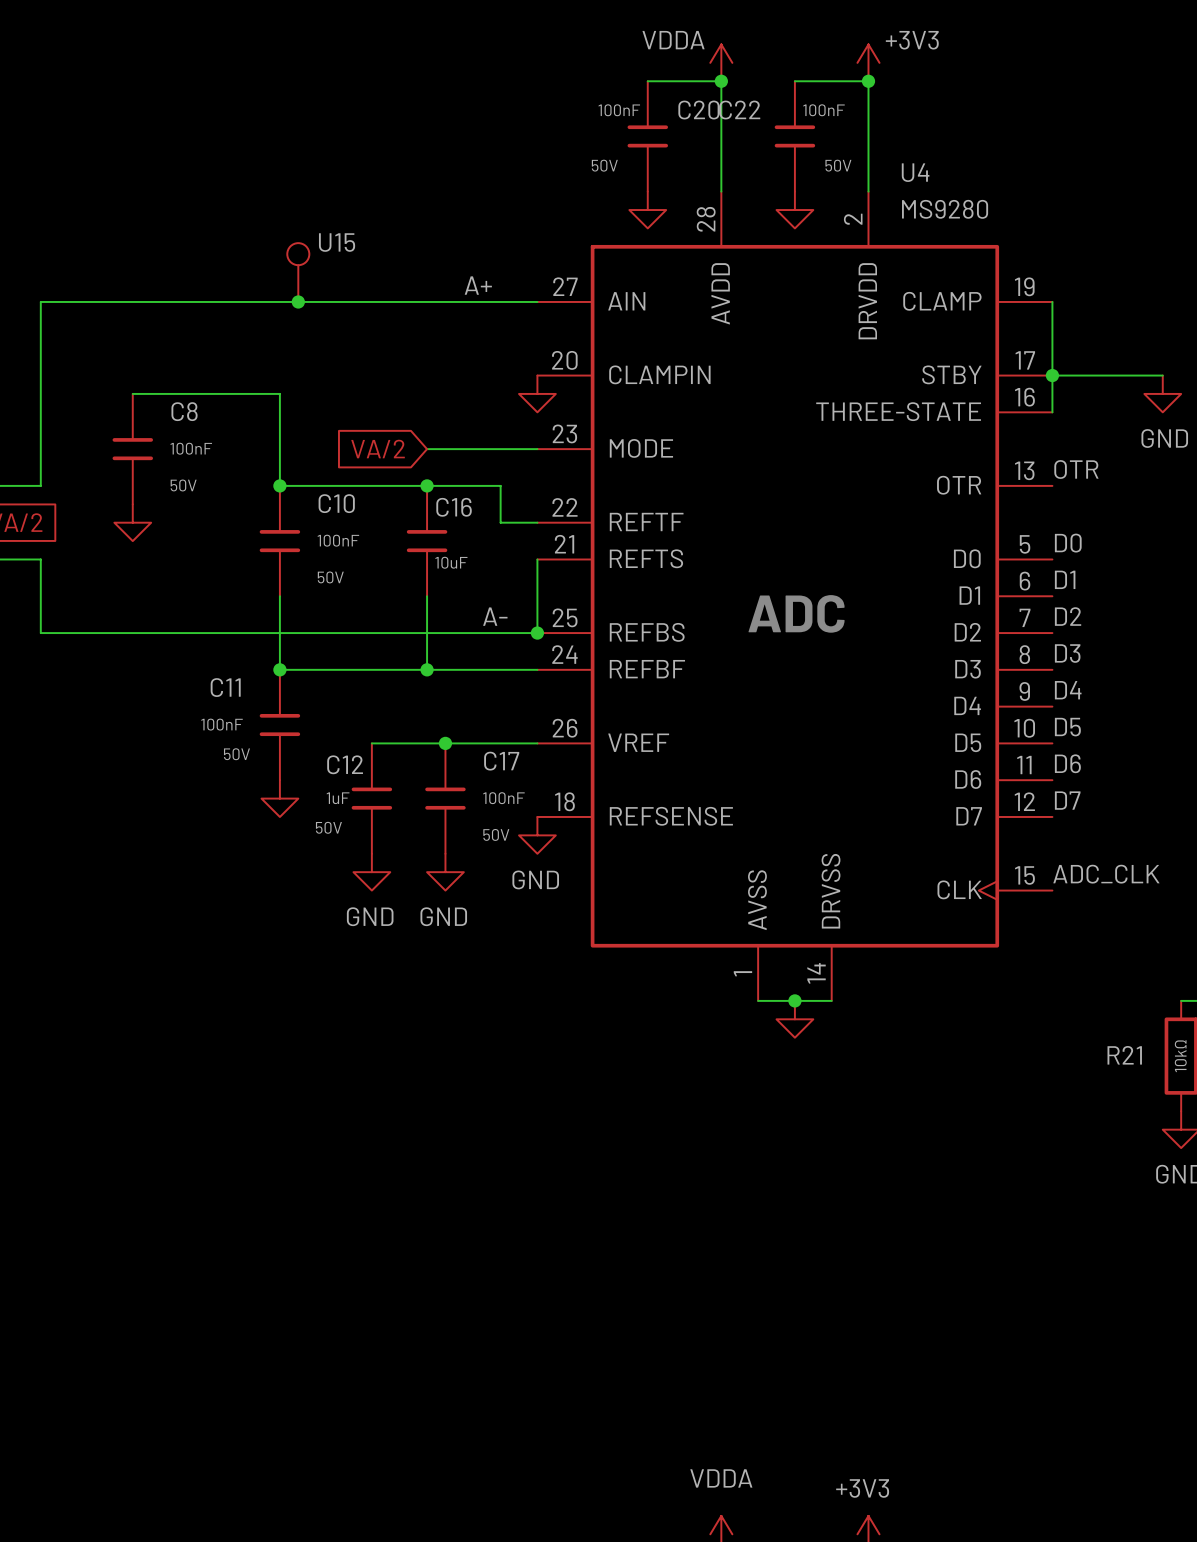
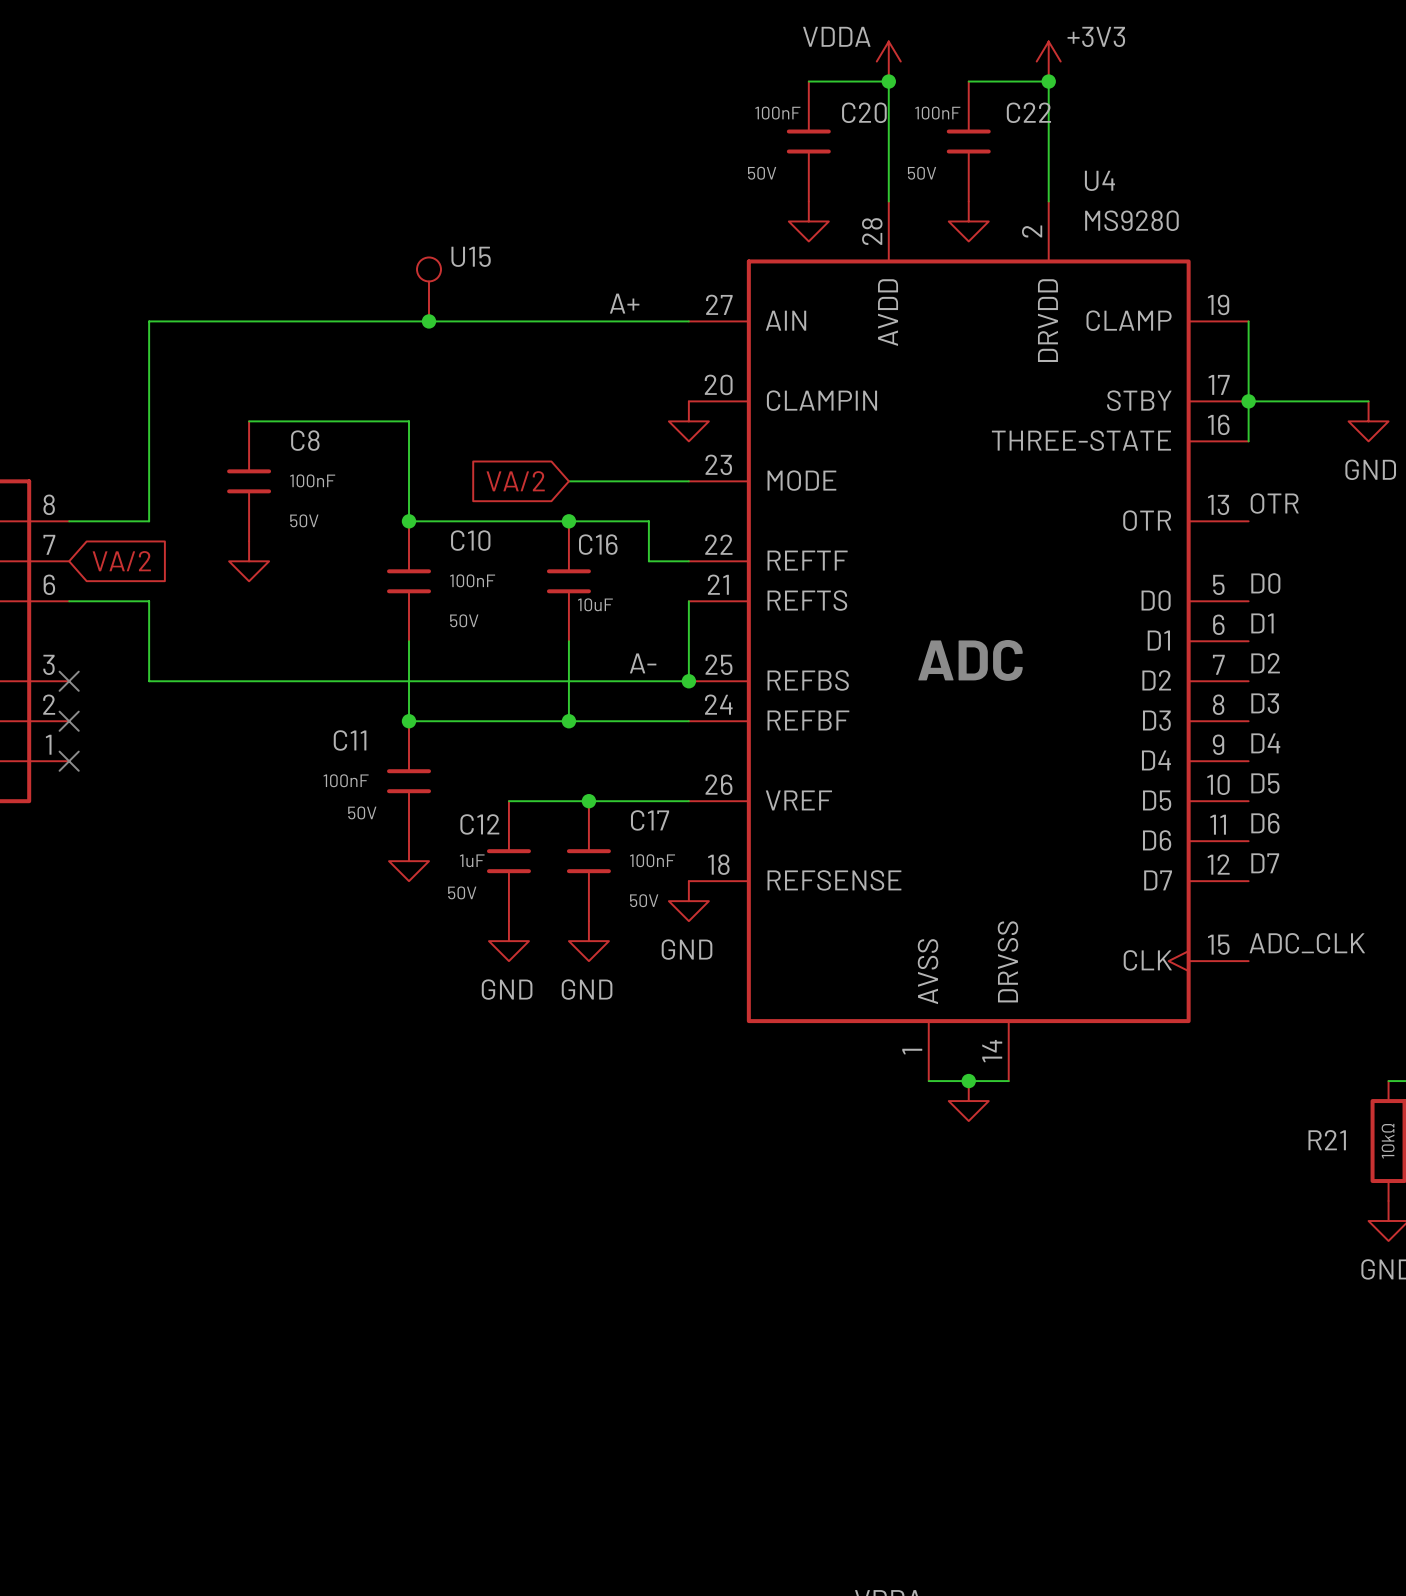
C22 name position: C22 (739, 110) -> C22 (1028, 112)
C22 value position: 100nF (823, 110) -> 100nF (937, 113)
C22 text position: 50V (838, 165) -> 50V (922, 173)

